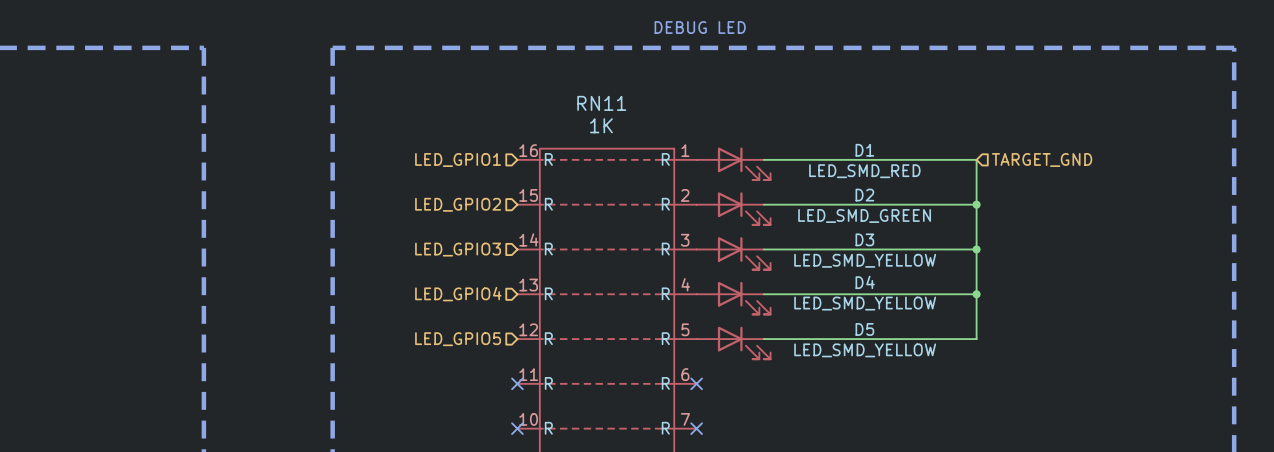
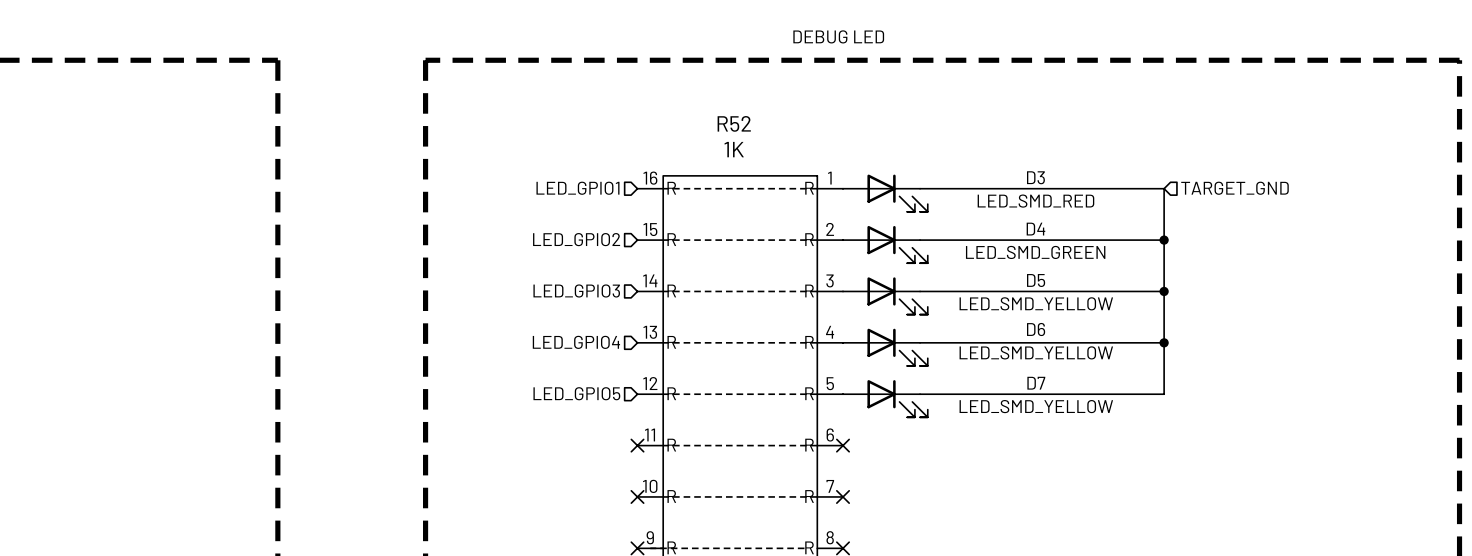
RN11 name: RN11 (601, 103) -> R52 (734, 123)
D1 name: D1 (864, 150) -> D3 (1035, 177)
D2 name: D2 (864, 195) -> D4 (1035, 229)
D3 name: D3 (864, 239) -> D5 (1036, 280)
D4 name: D4 (865, 282) -> D6 (1036, 329)
D5 name: D5 (864, 329) -> D7 (1036, 383)

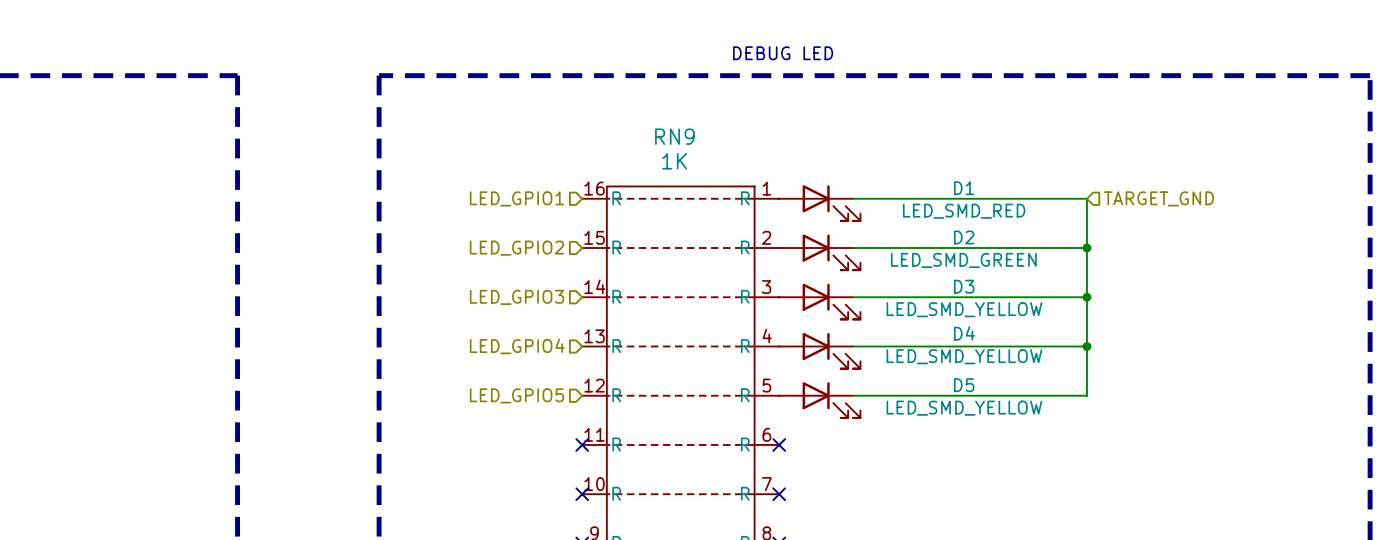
R52 name: R52 (734, 123) -> RN9 (674, 136)
D3 name: D3 (1035, 177) -> D1 (964, 188)
D4 name: D4 (1035, 229) -> D2 (964, 237)
D5 name: D5 (1036, 280) -> D3 (964, 286)
D6 name: D6 (1036, 329) -> D4 (964, 333)
D7 name: D7 (1036, 383) -> D5 (964, 385)

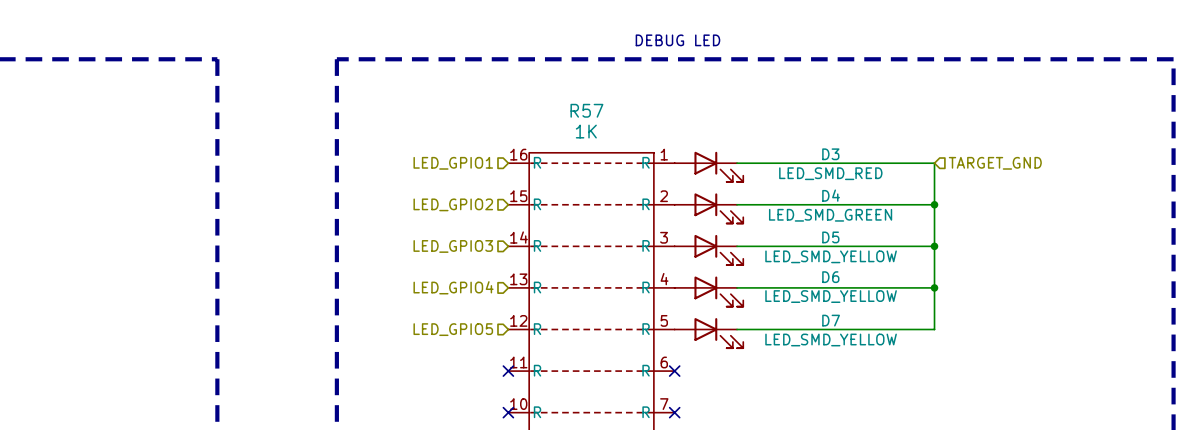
RN9 name: RN9 (674, 136) -> R57 (586, 110)
D1 name: D1 (964, 188) -> D3 (830, 154)
D2 name: D2 (964, 237) -> D4 (831, 195)
D3 name: D3 (964, 286) -> D5 (830, 237)
D4 name: D4 (964, 333) -> D6 (830, 277)
D5 name: D5 (964, 385) -> D7 (831, 320)

